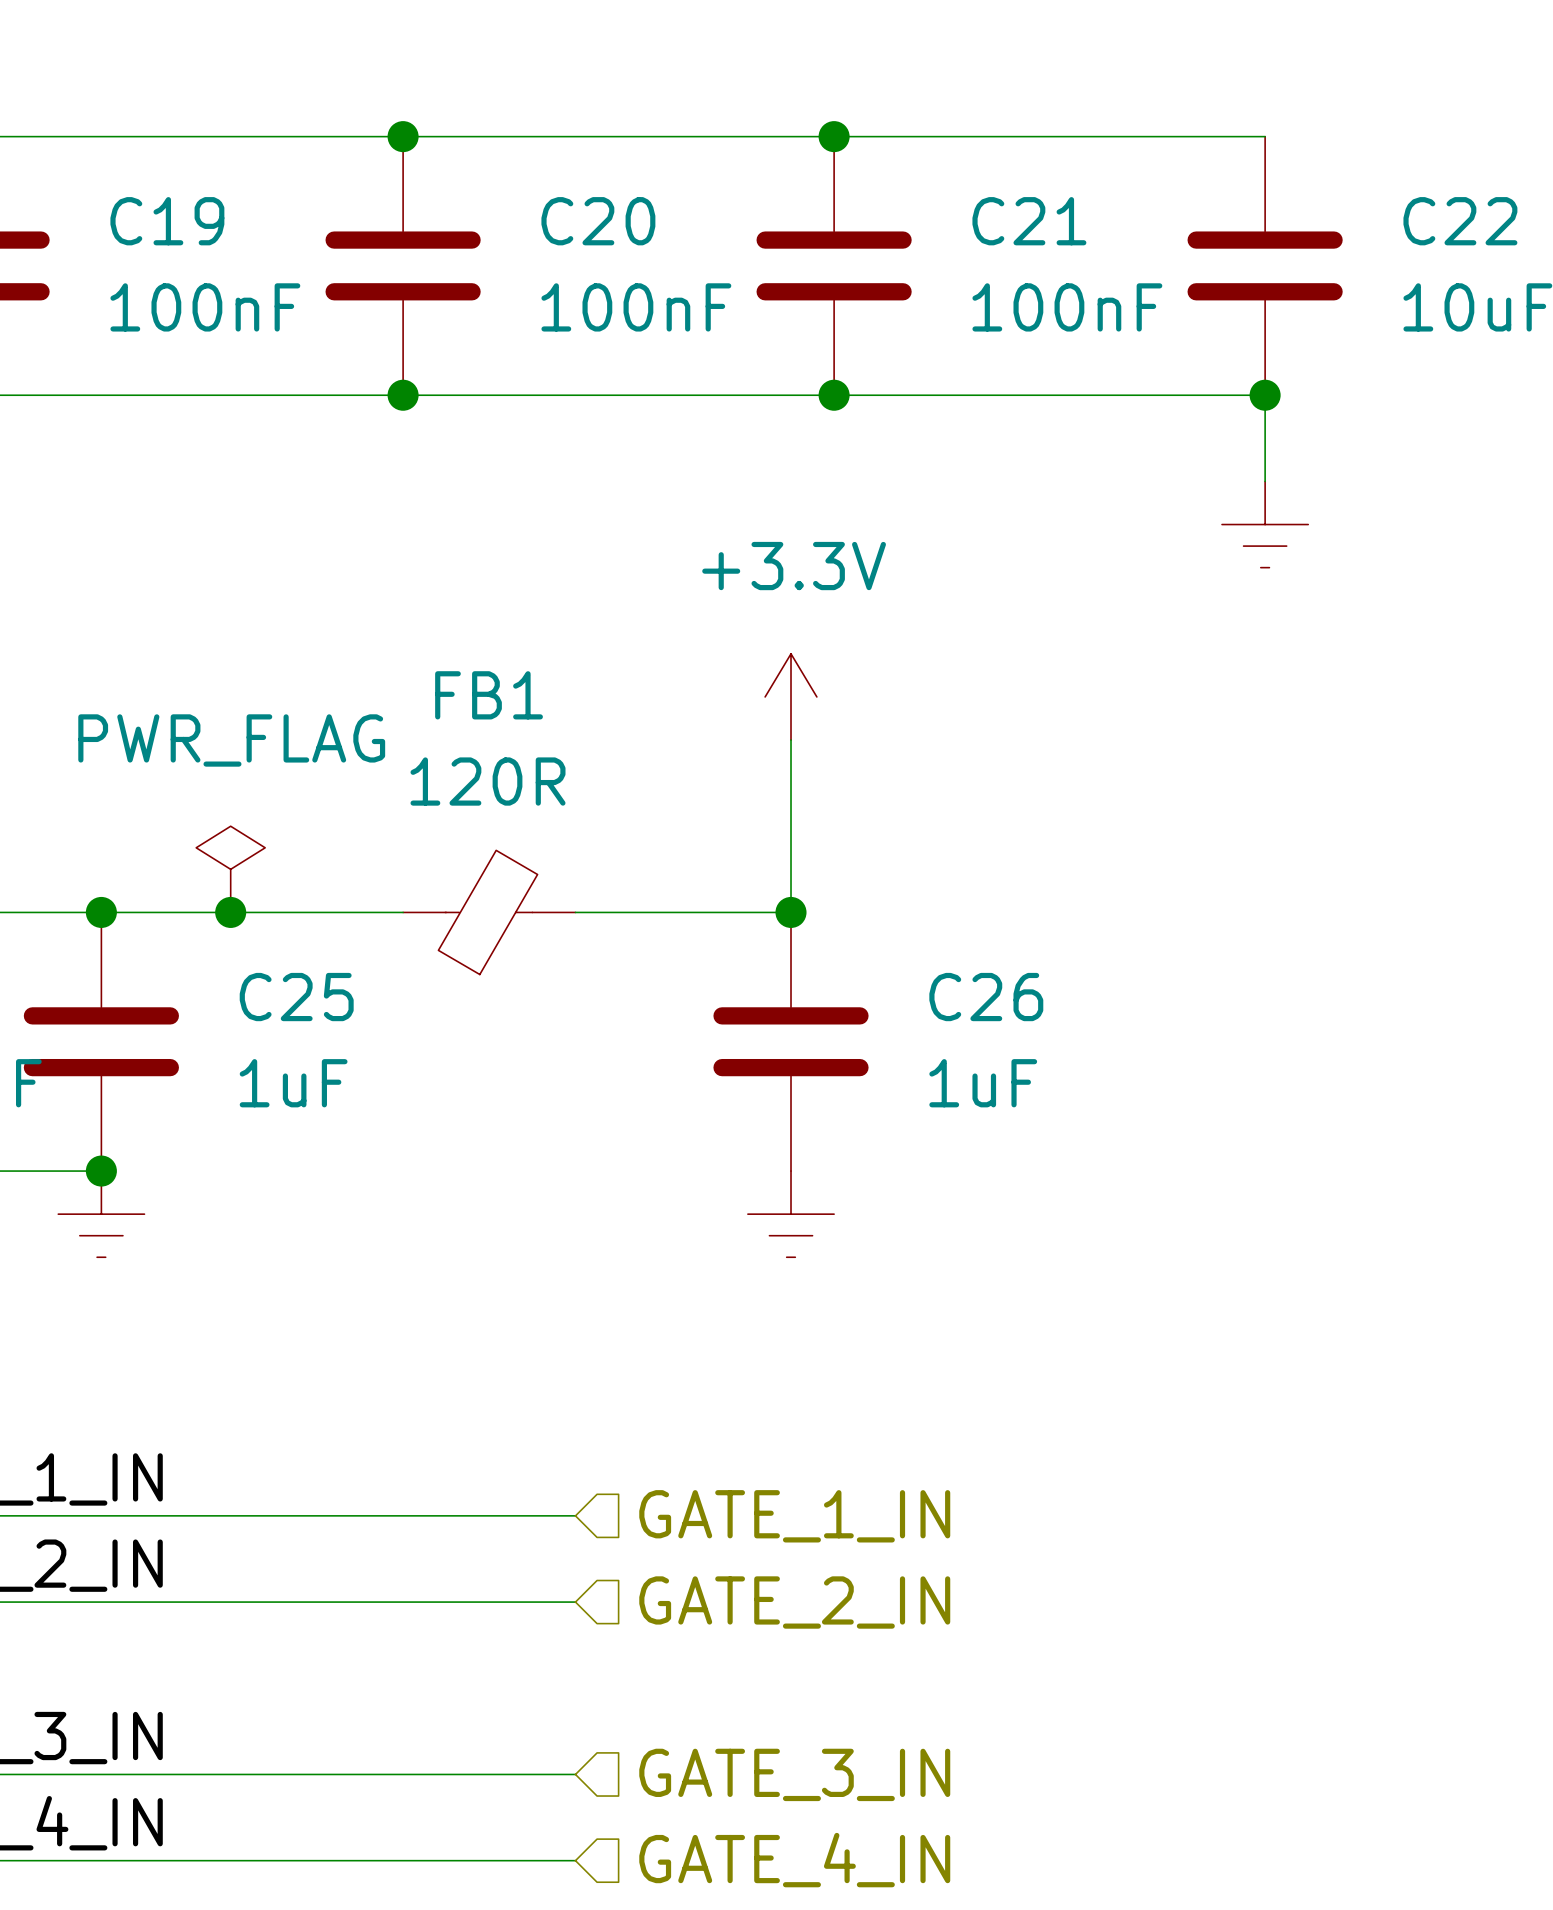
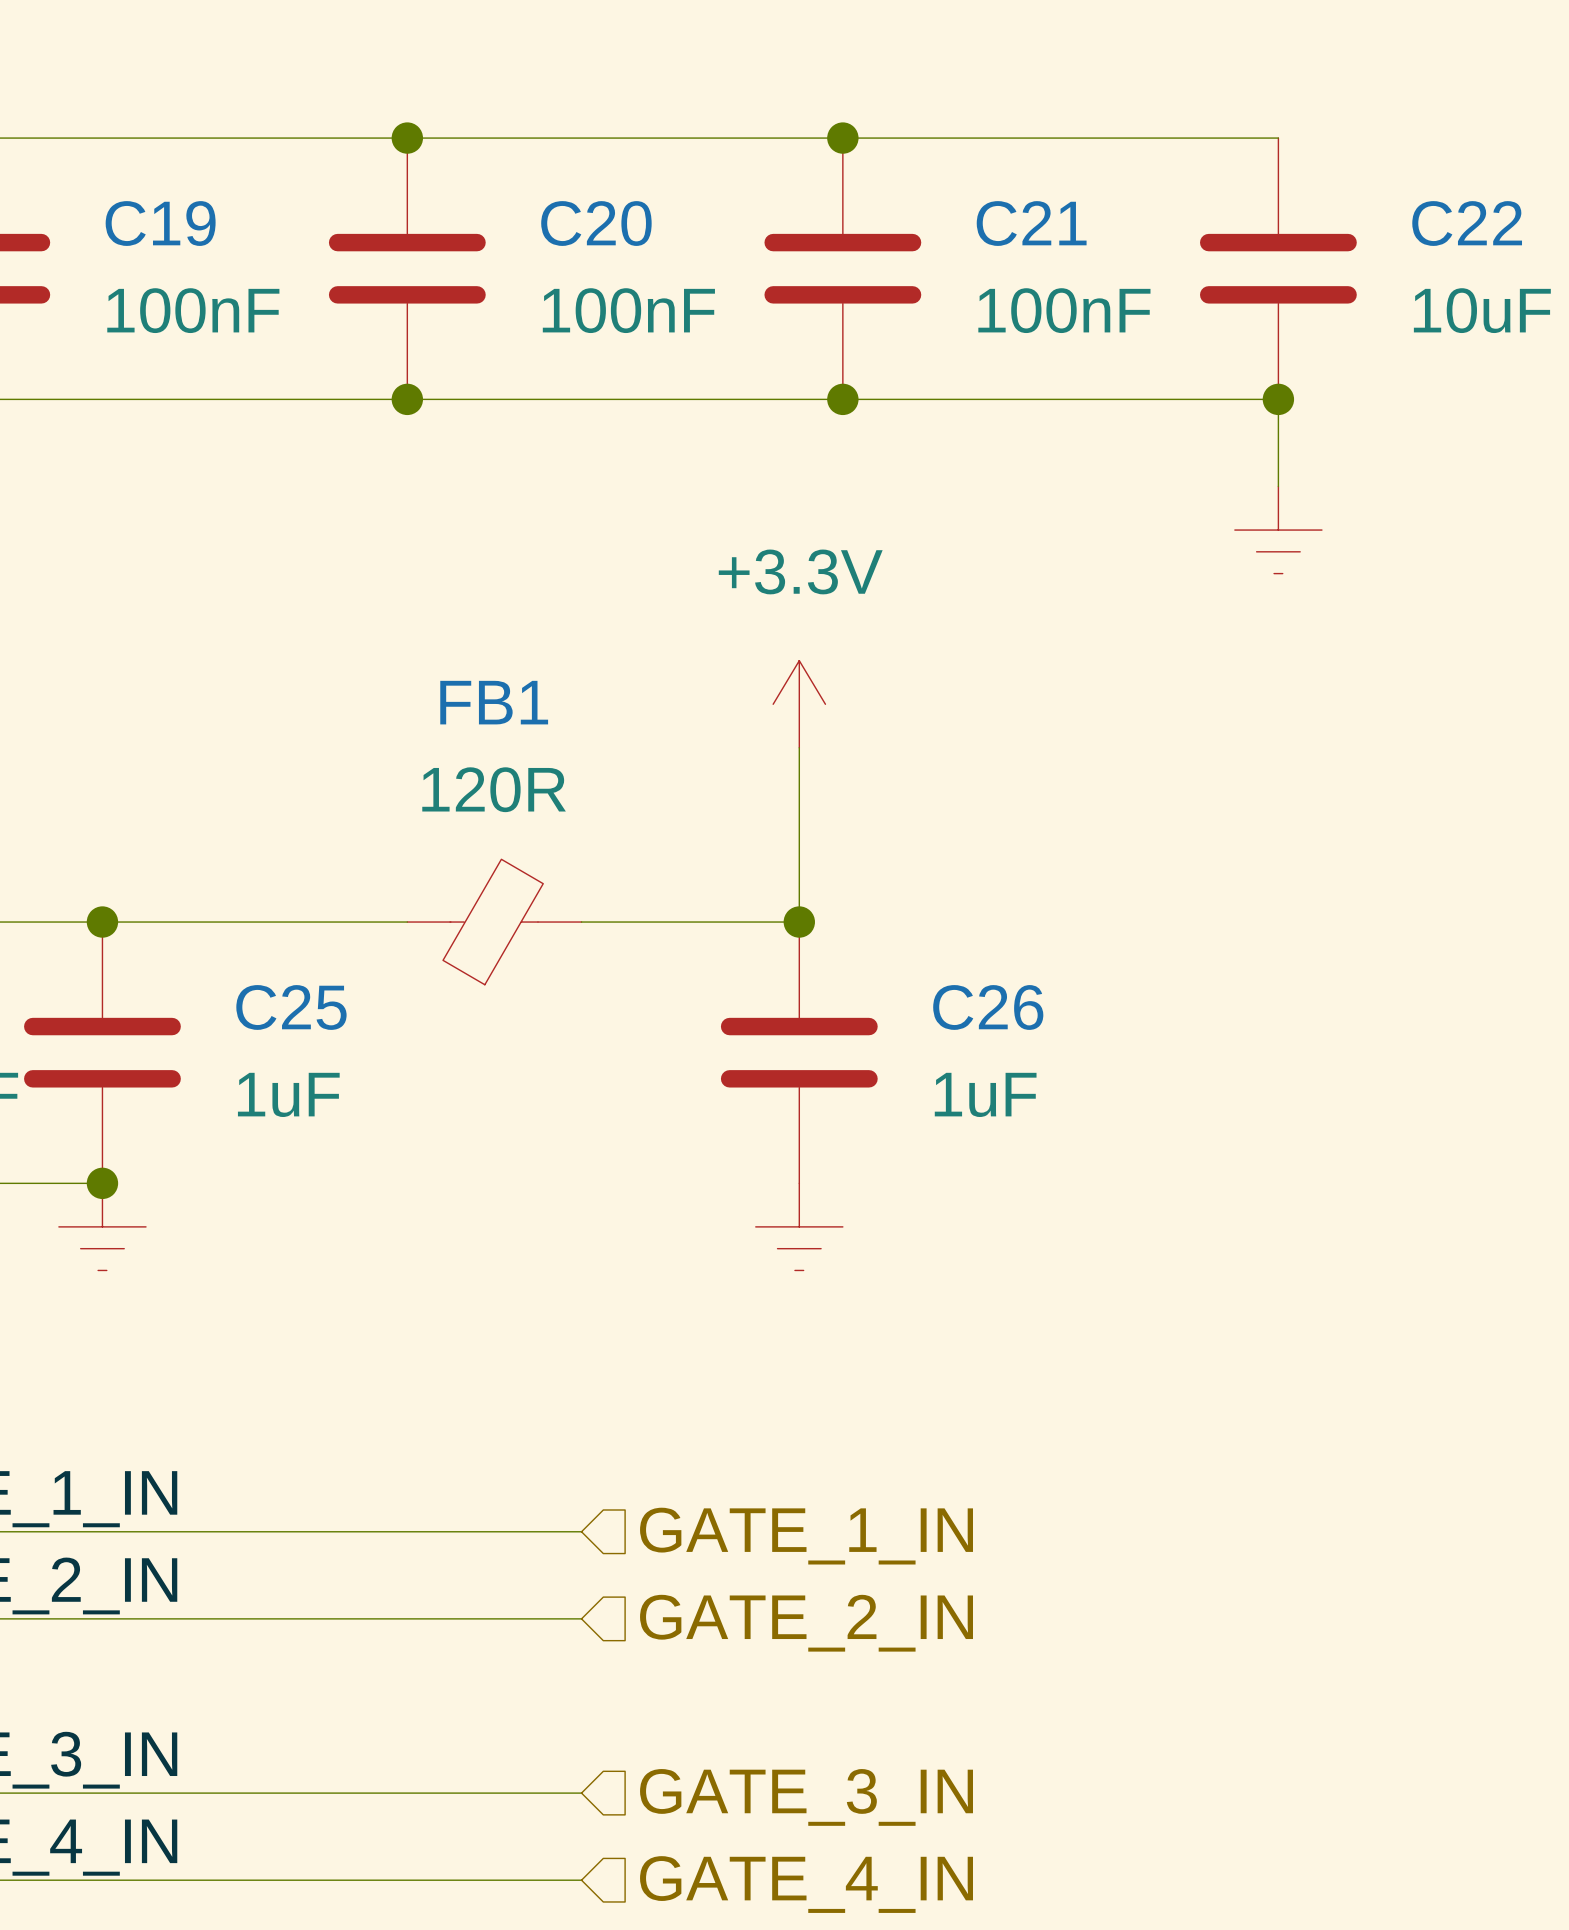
power symbol: PWR_FLAG (230, 869) -> none
junction: (230, 912) -> none

